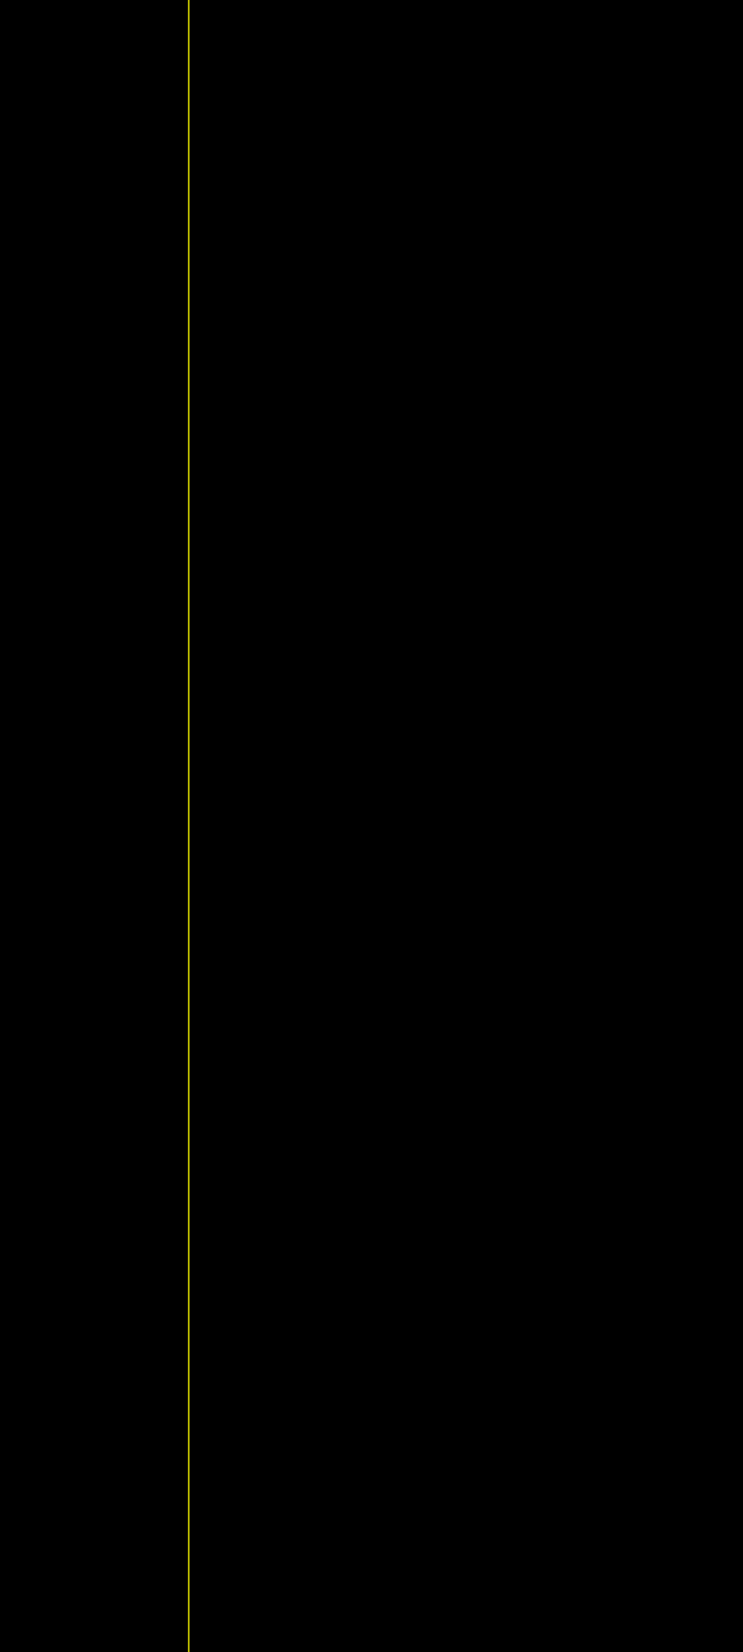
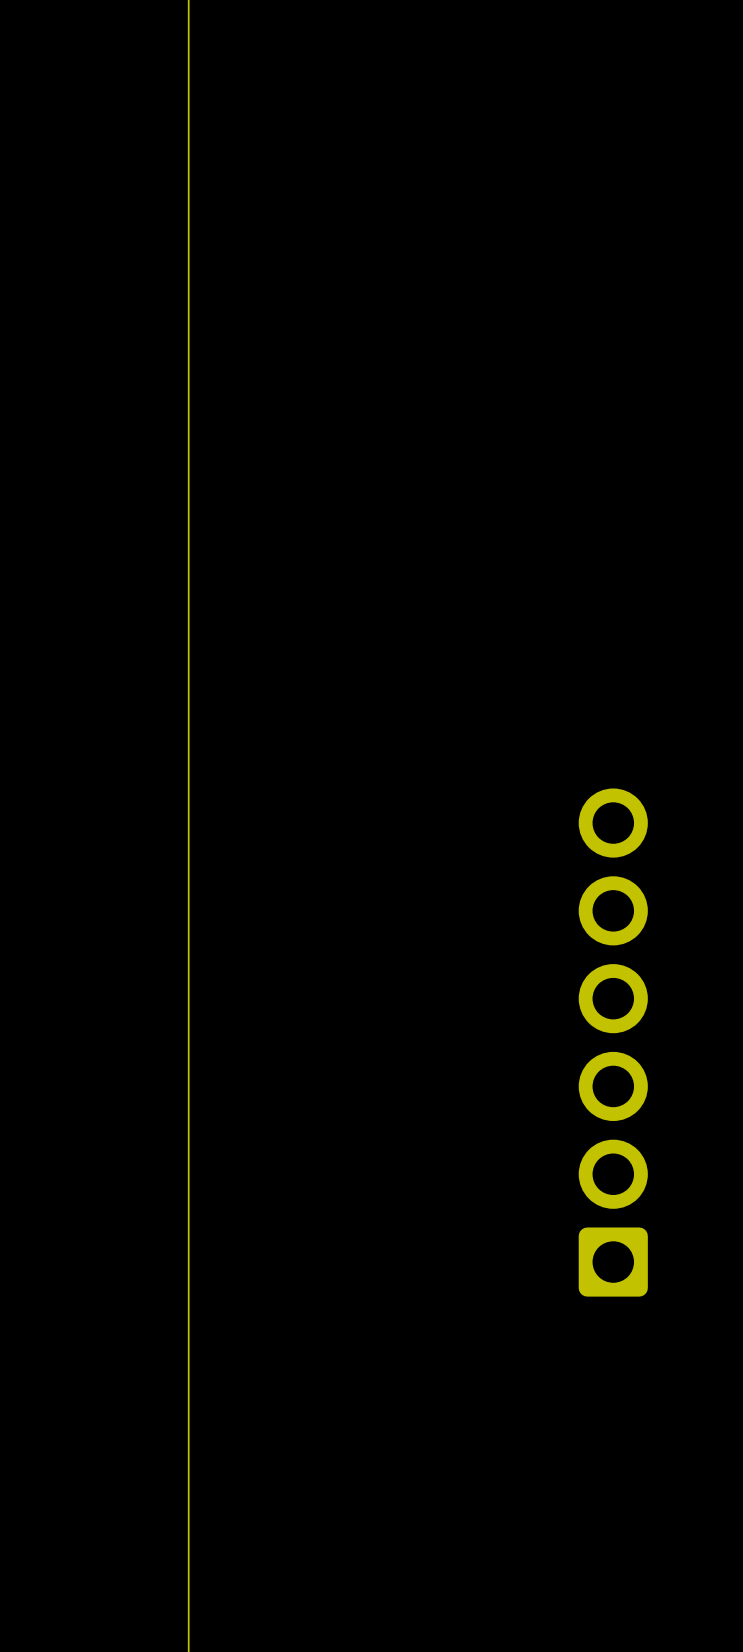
part: none -> (613, 1042)

